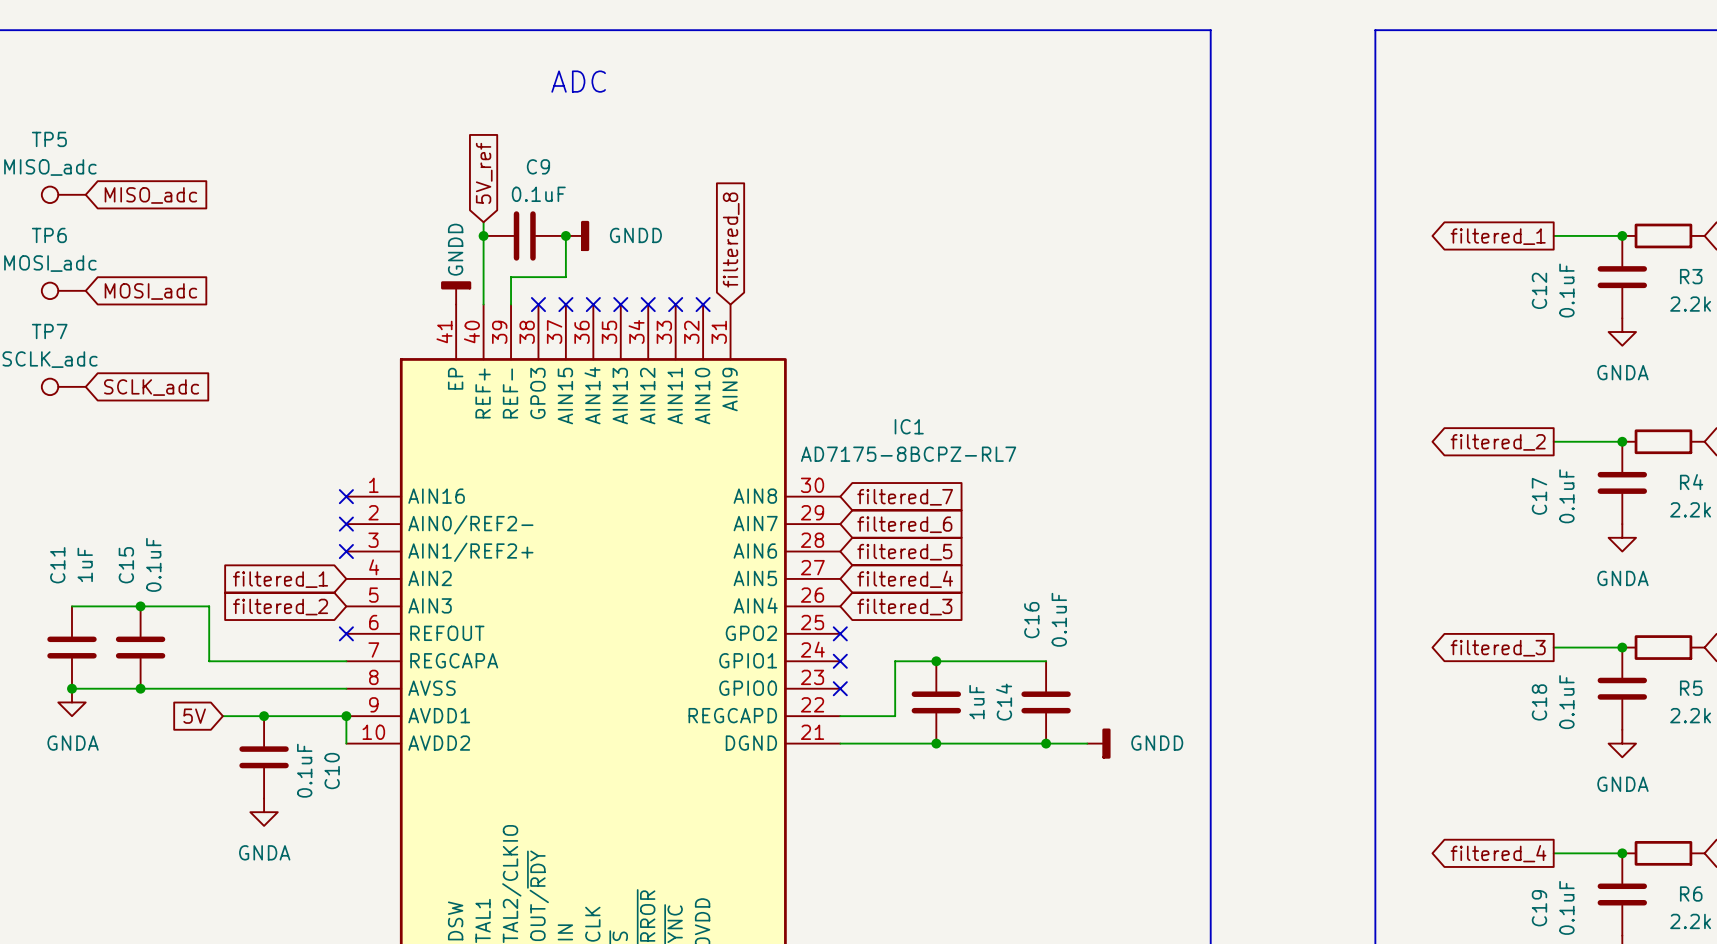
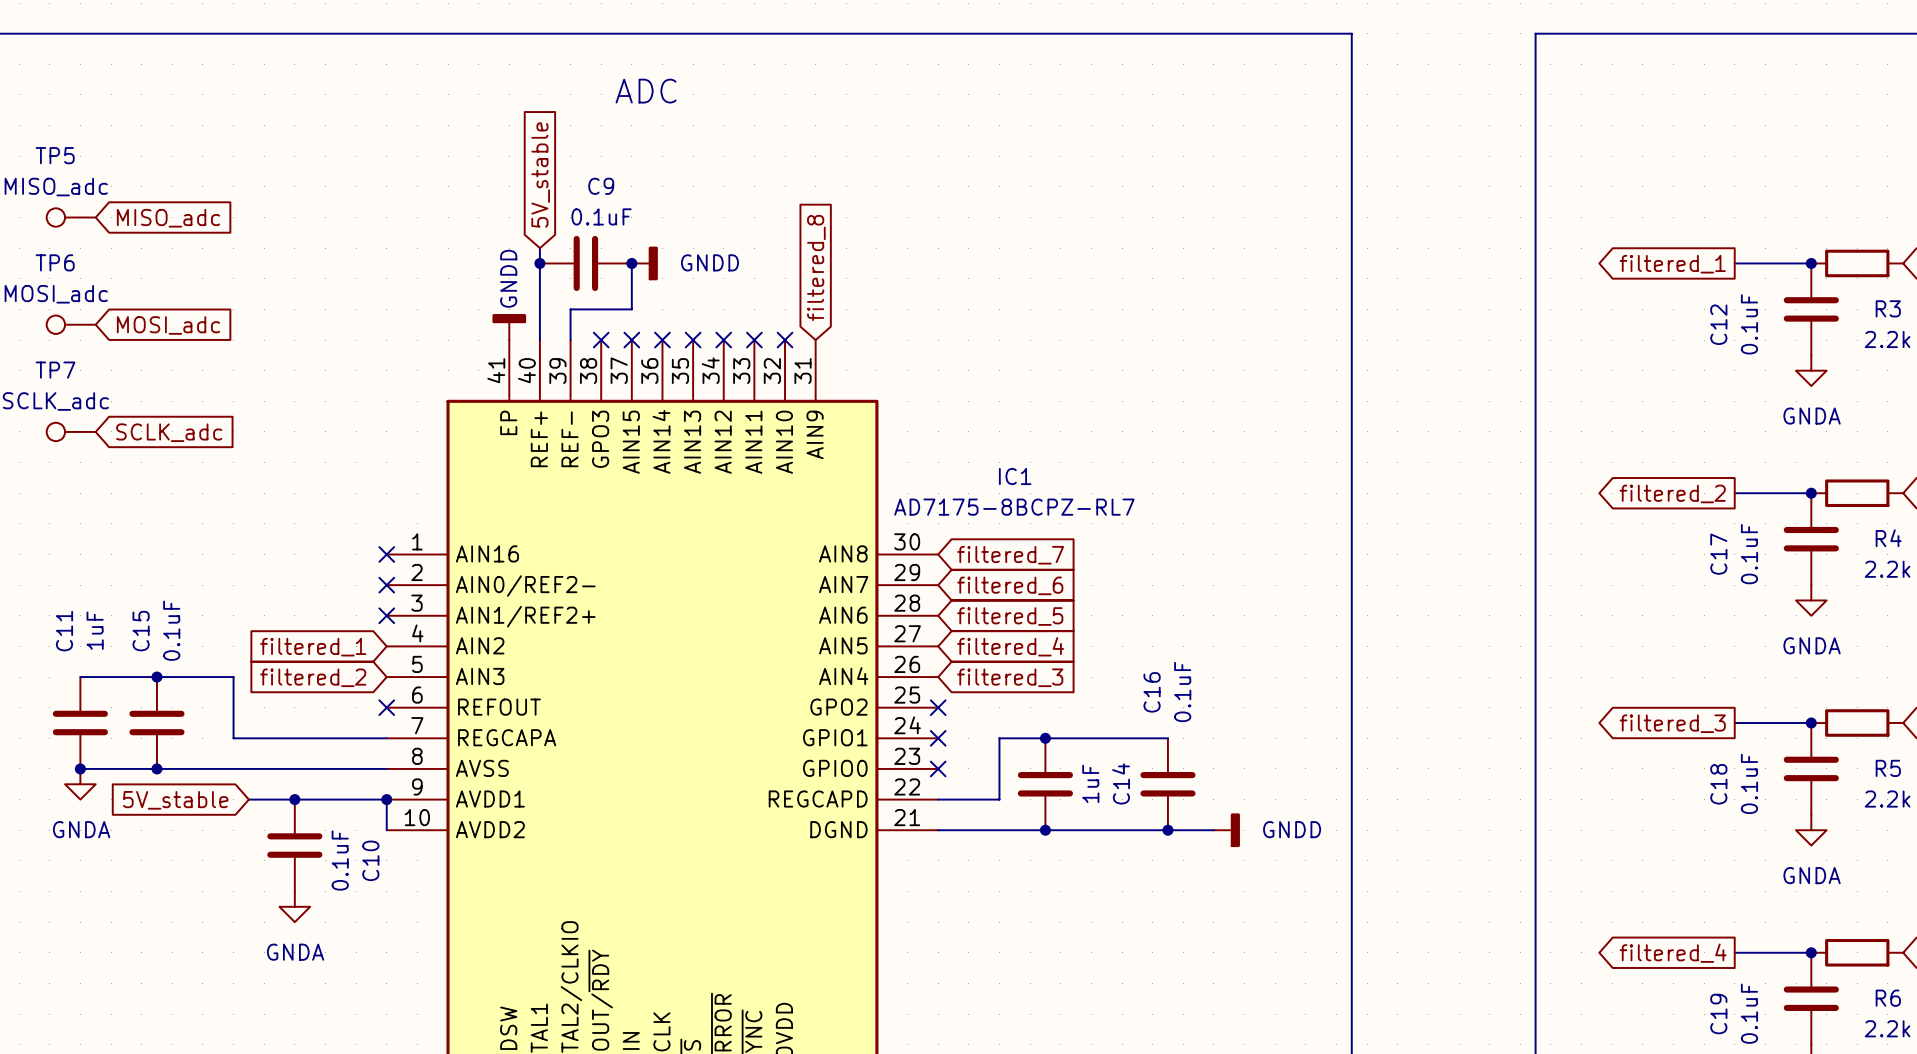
global label: 5V_ref (484, 173) -> 5V_stable (540, 174)
global label: 5V (194, 716) -> 5V_stable (175, 800)

